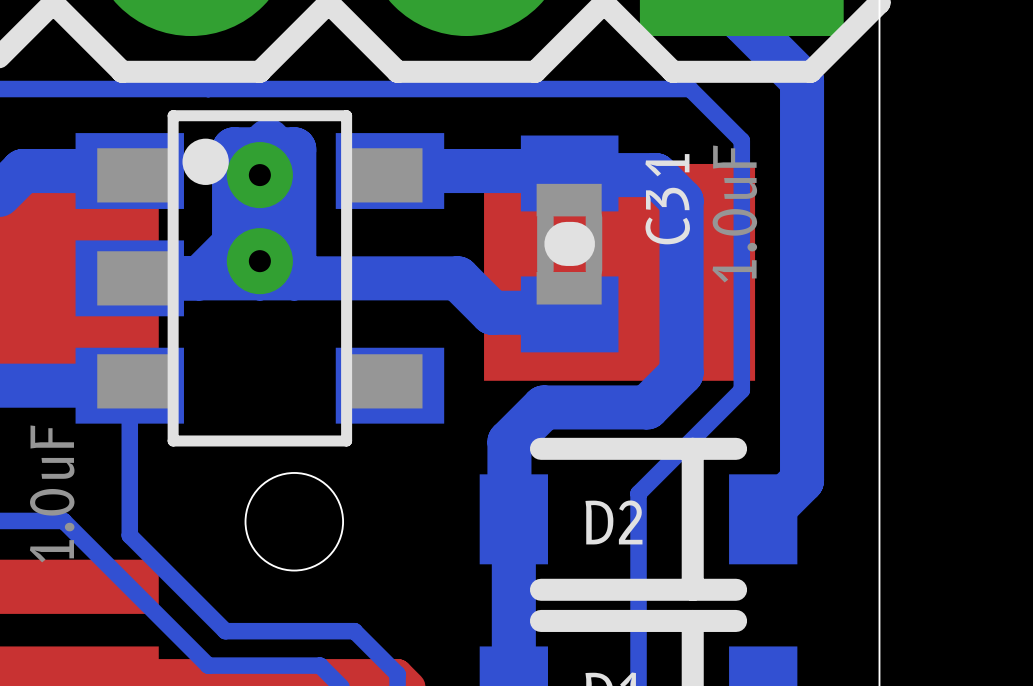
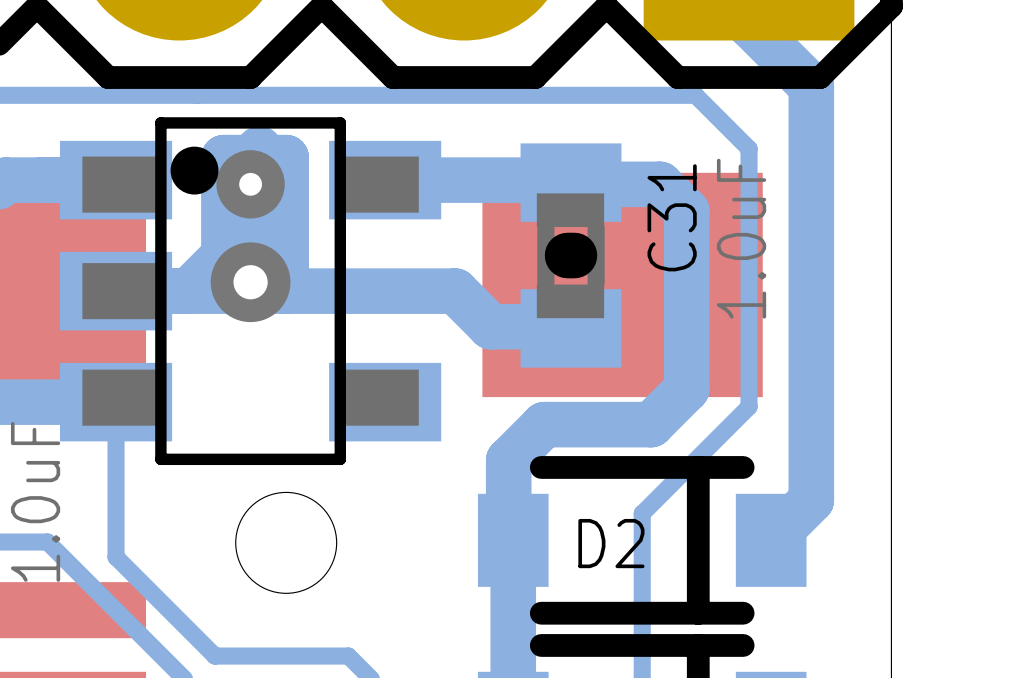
via size: [226, 228, 293, 295] -> [210, 242, 291, 323]

